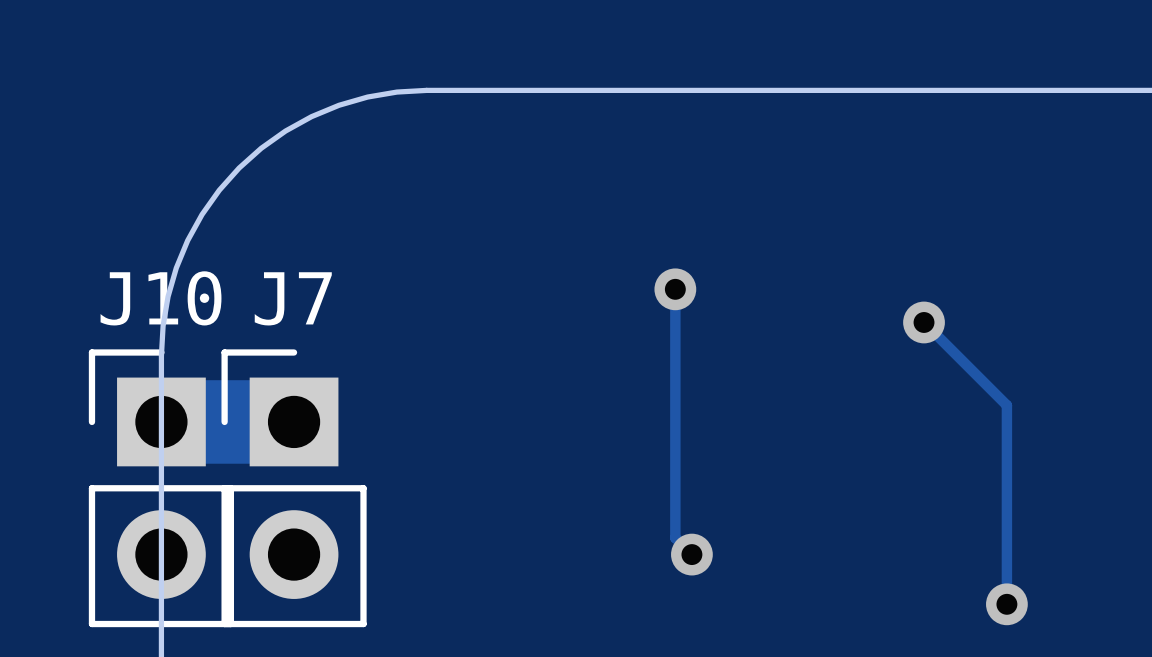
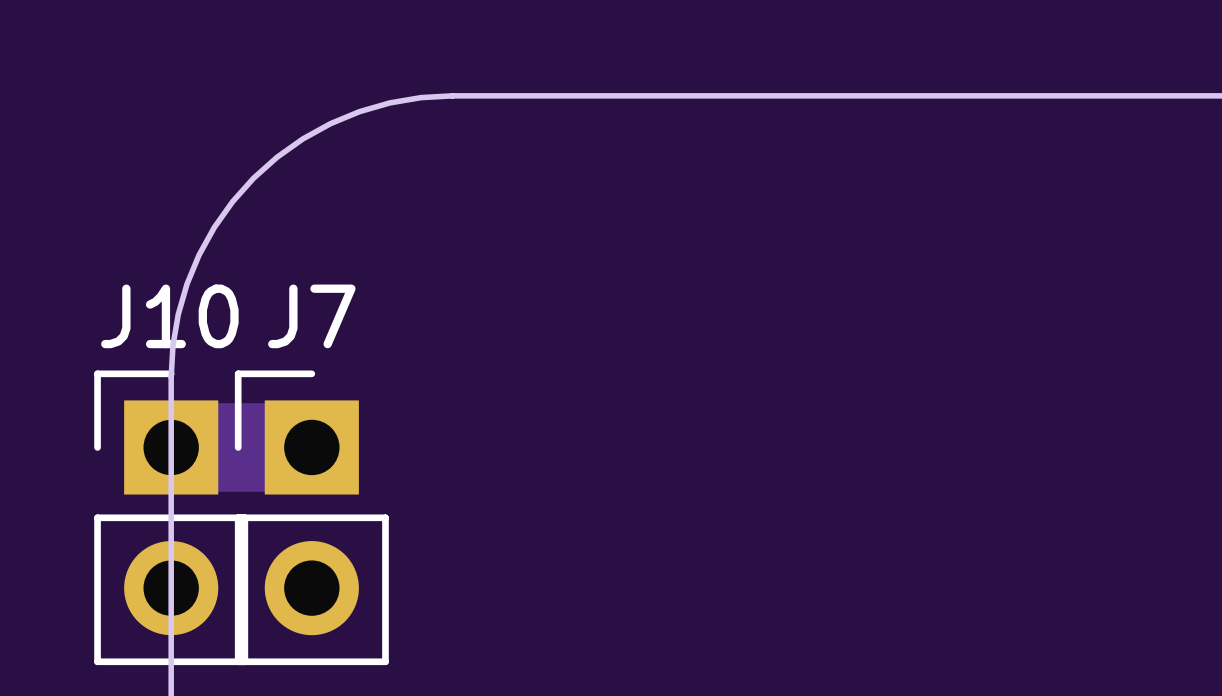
track: (675, 289) (675, 538) (691, 554) -> none
via: (675, 289) -> none
track: (924, 322) (1006, 405) (1006, 604) -> none
via: (924, 322) -> none
via: (691, 554) -> none
via: (1006, 604) -> none

